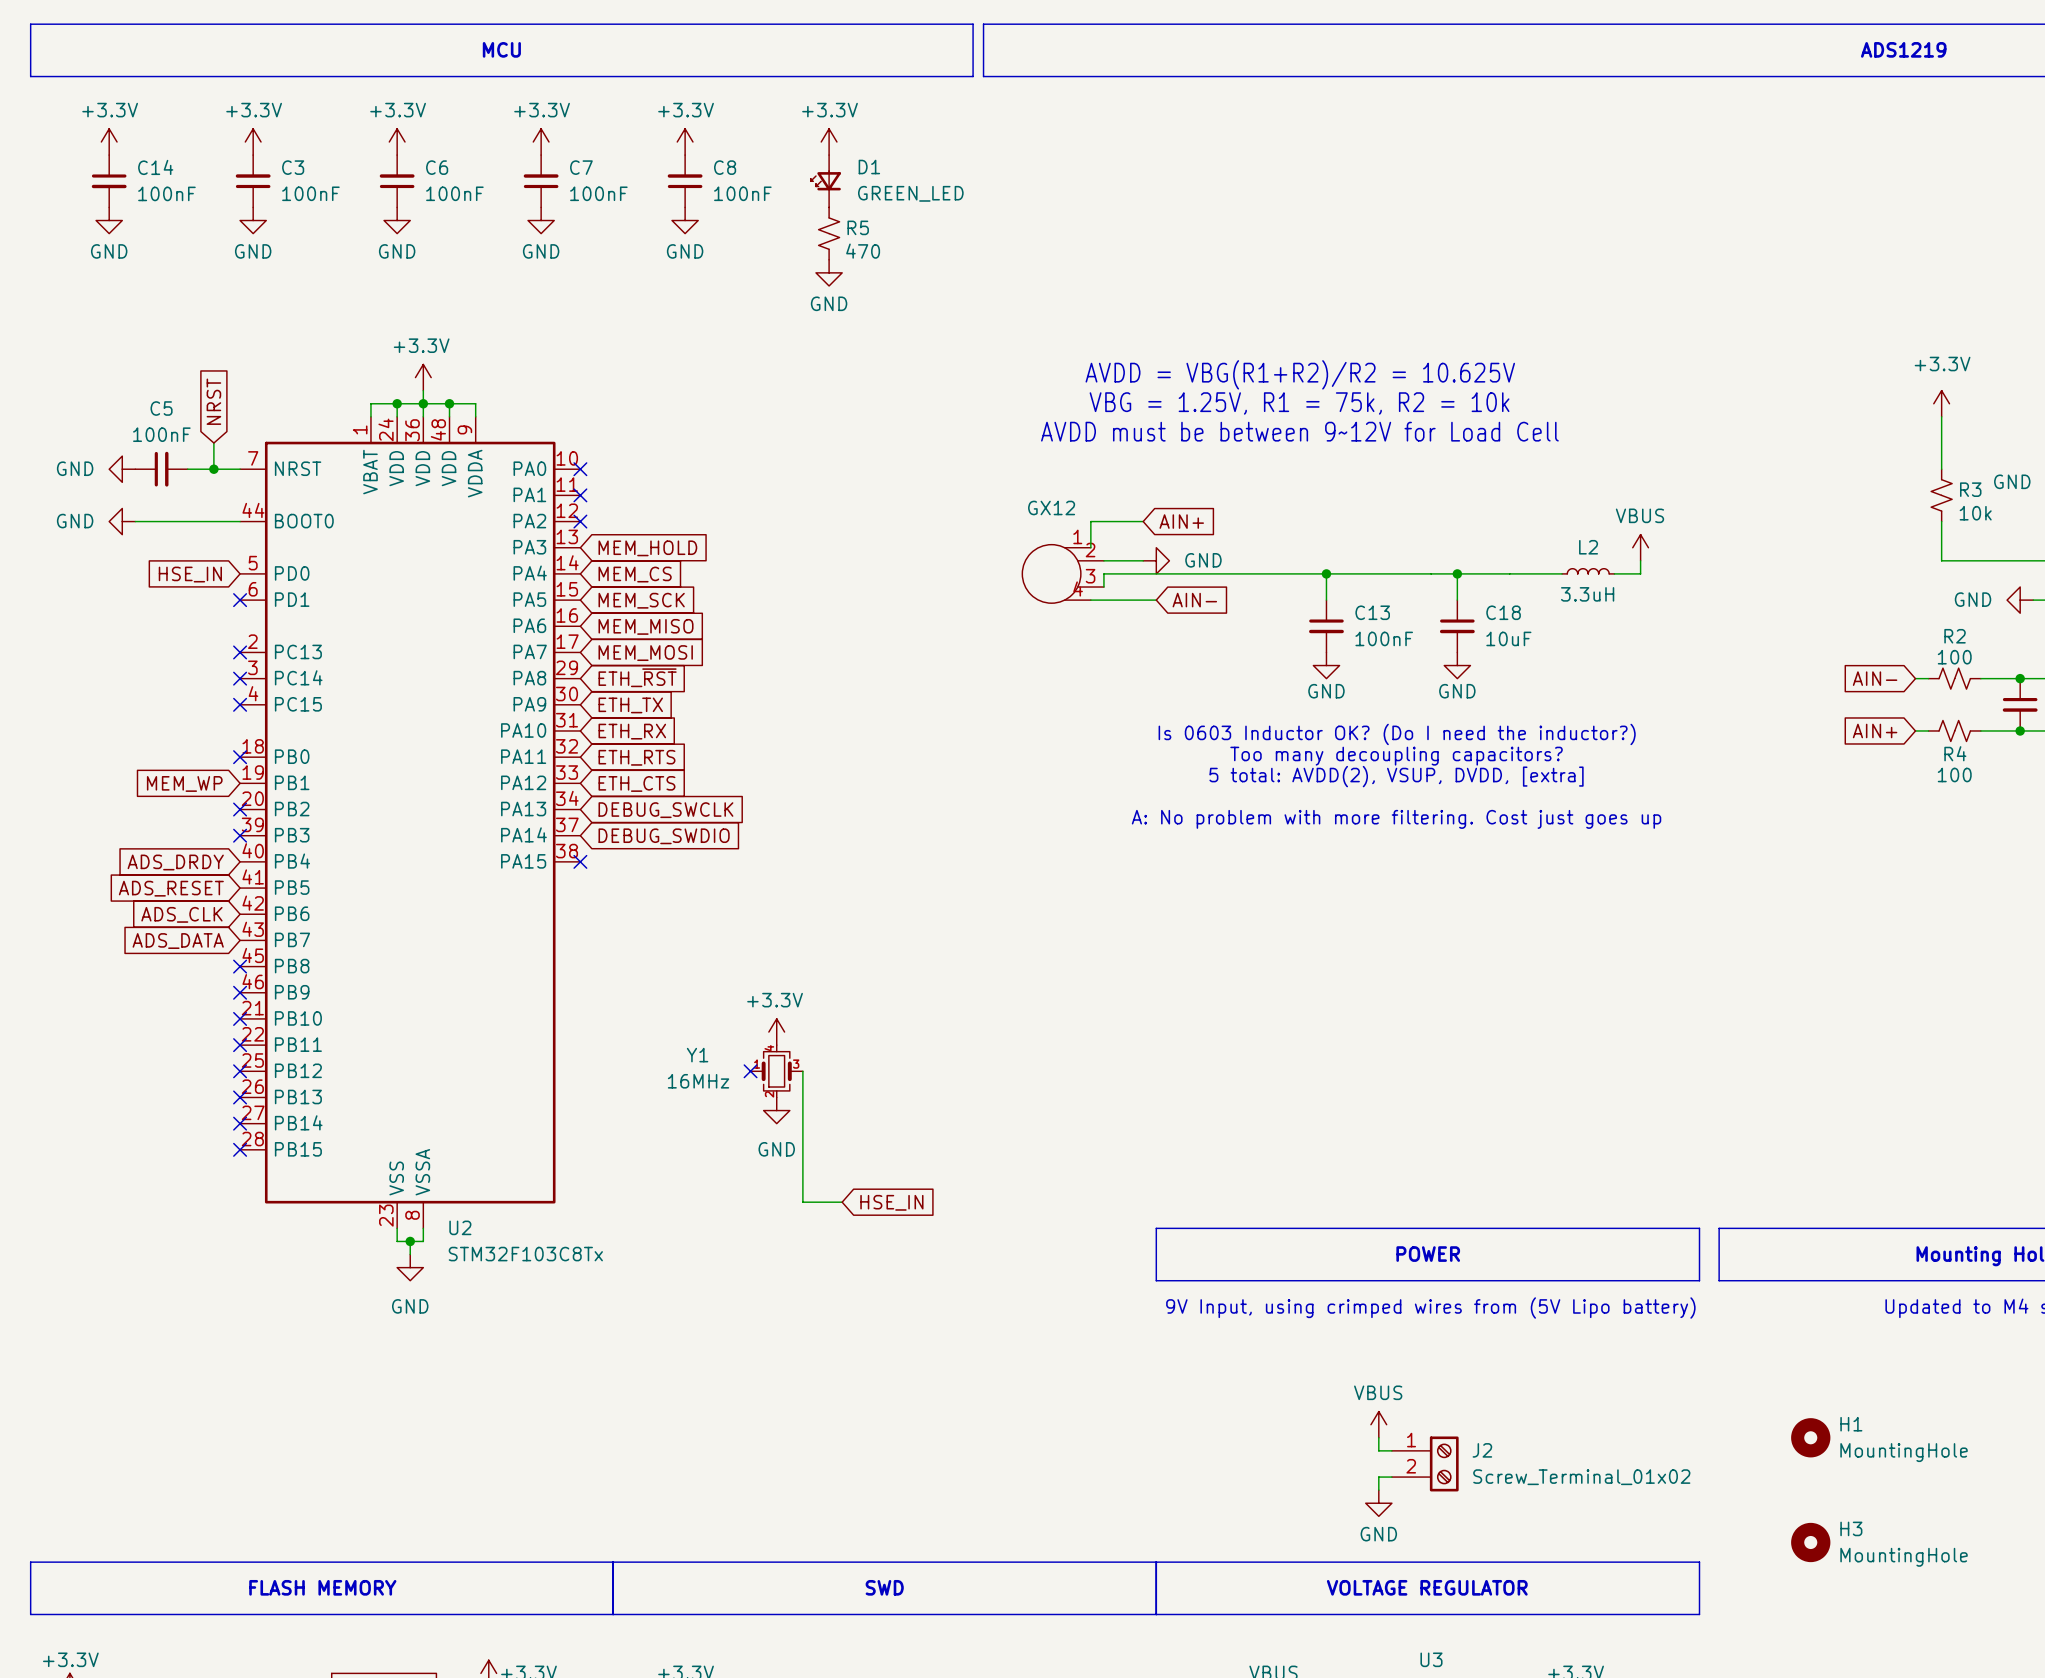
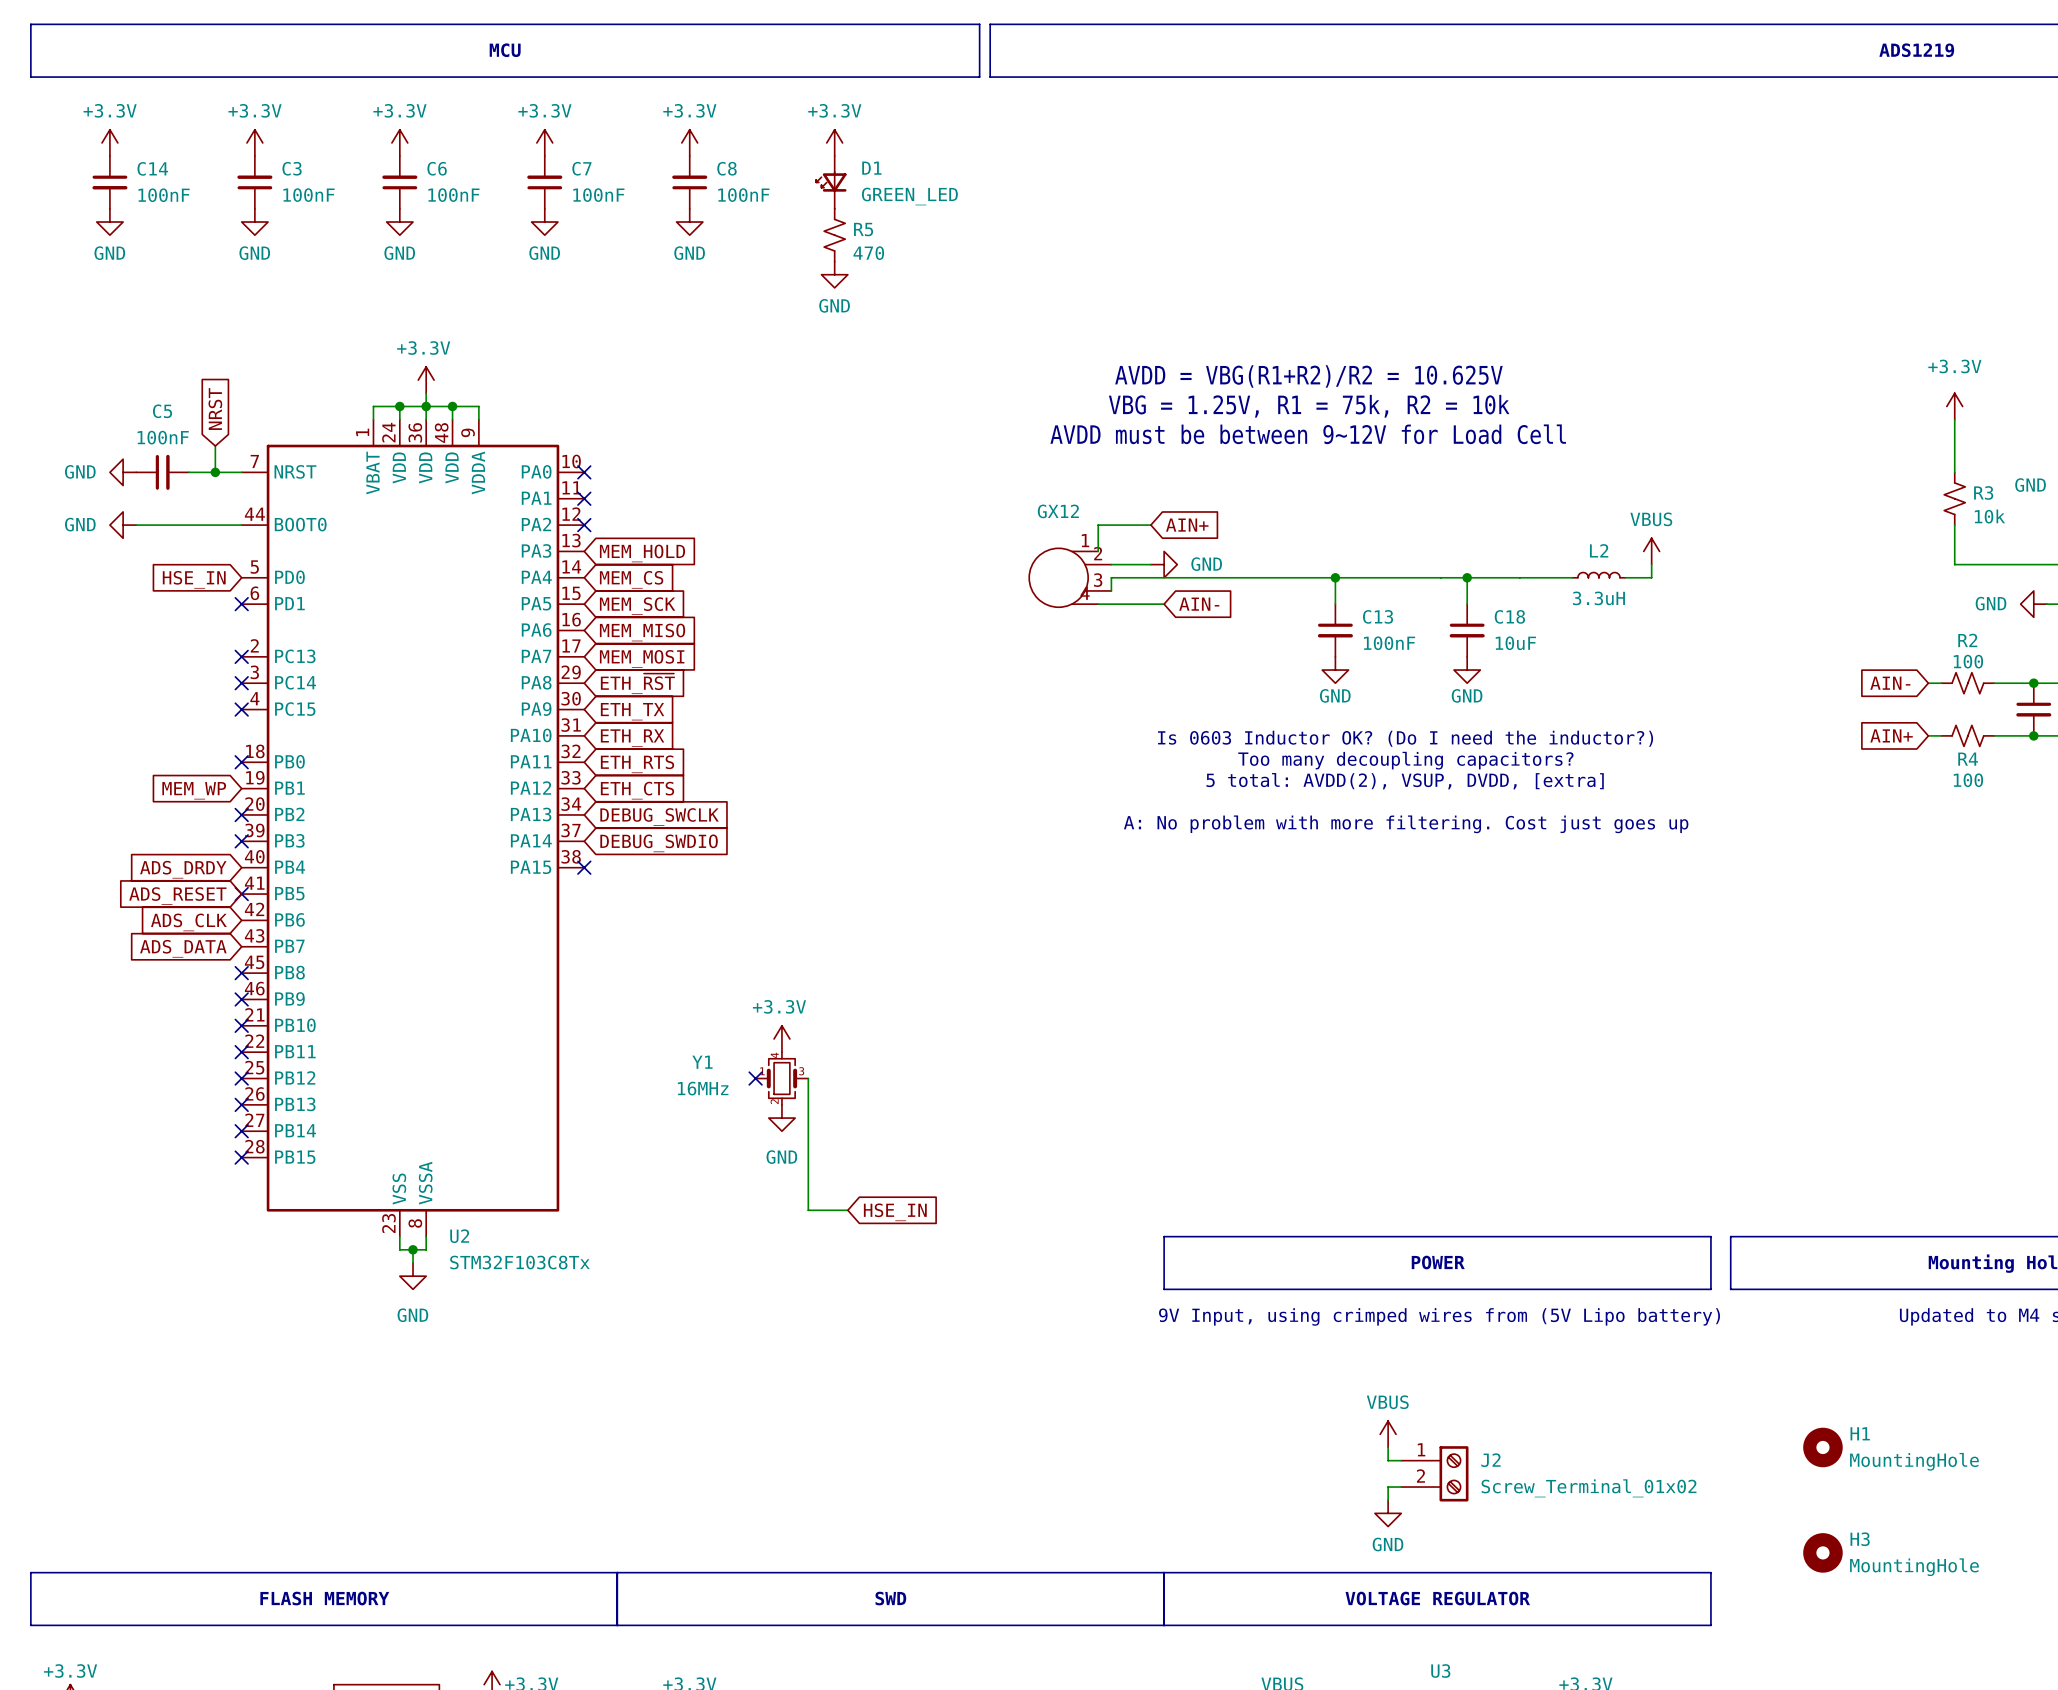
no-connect mark: none -> (241, 894)

